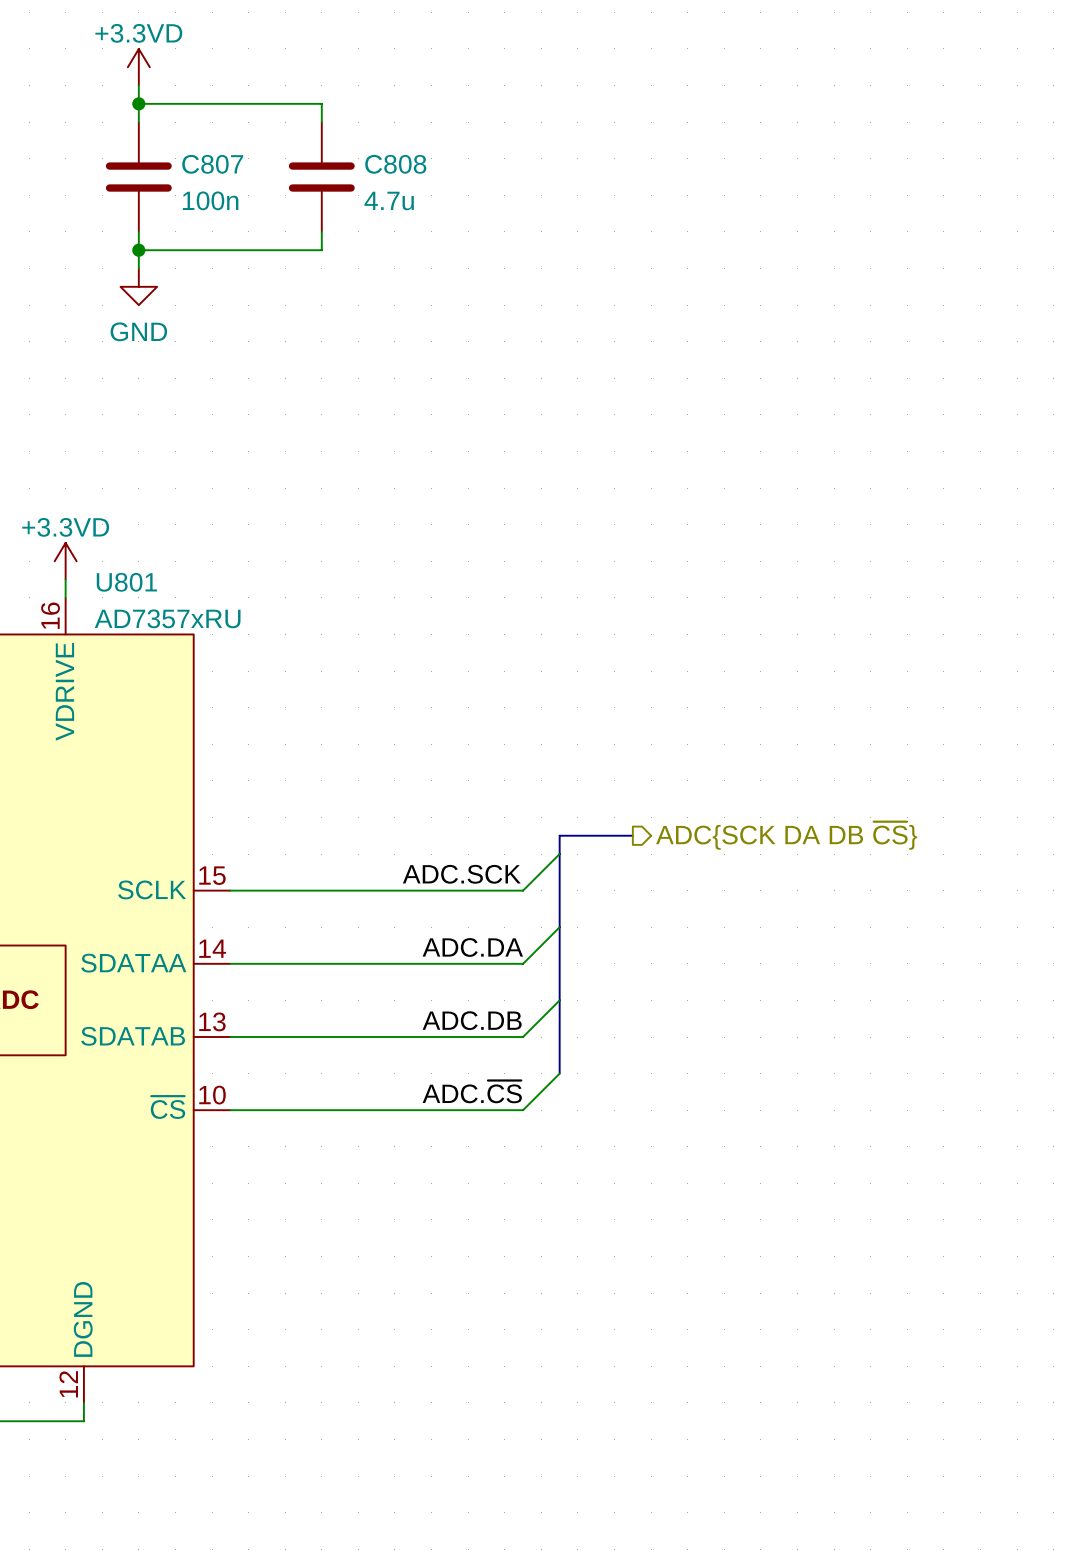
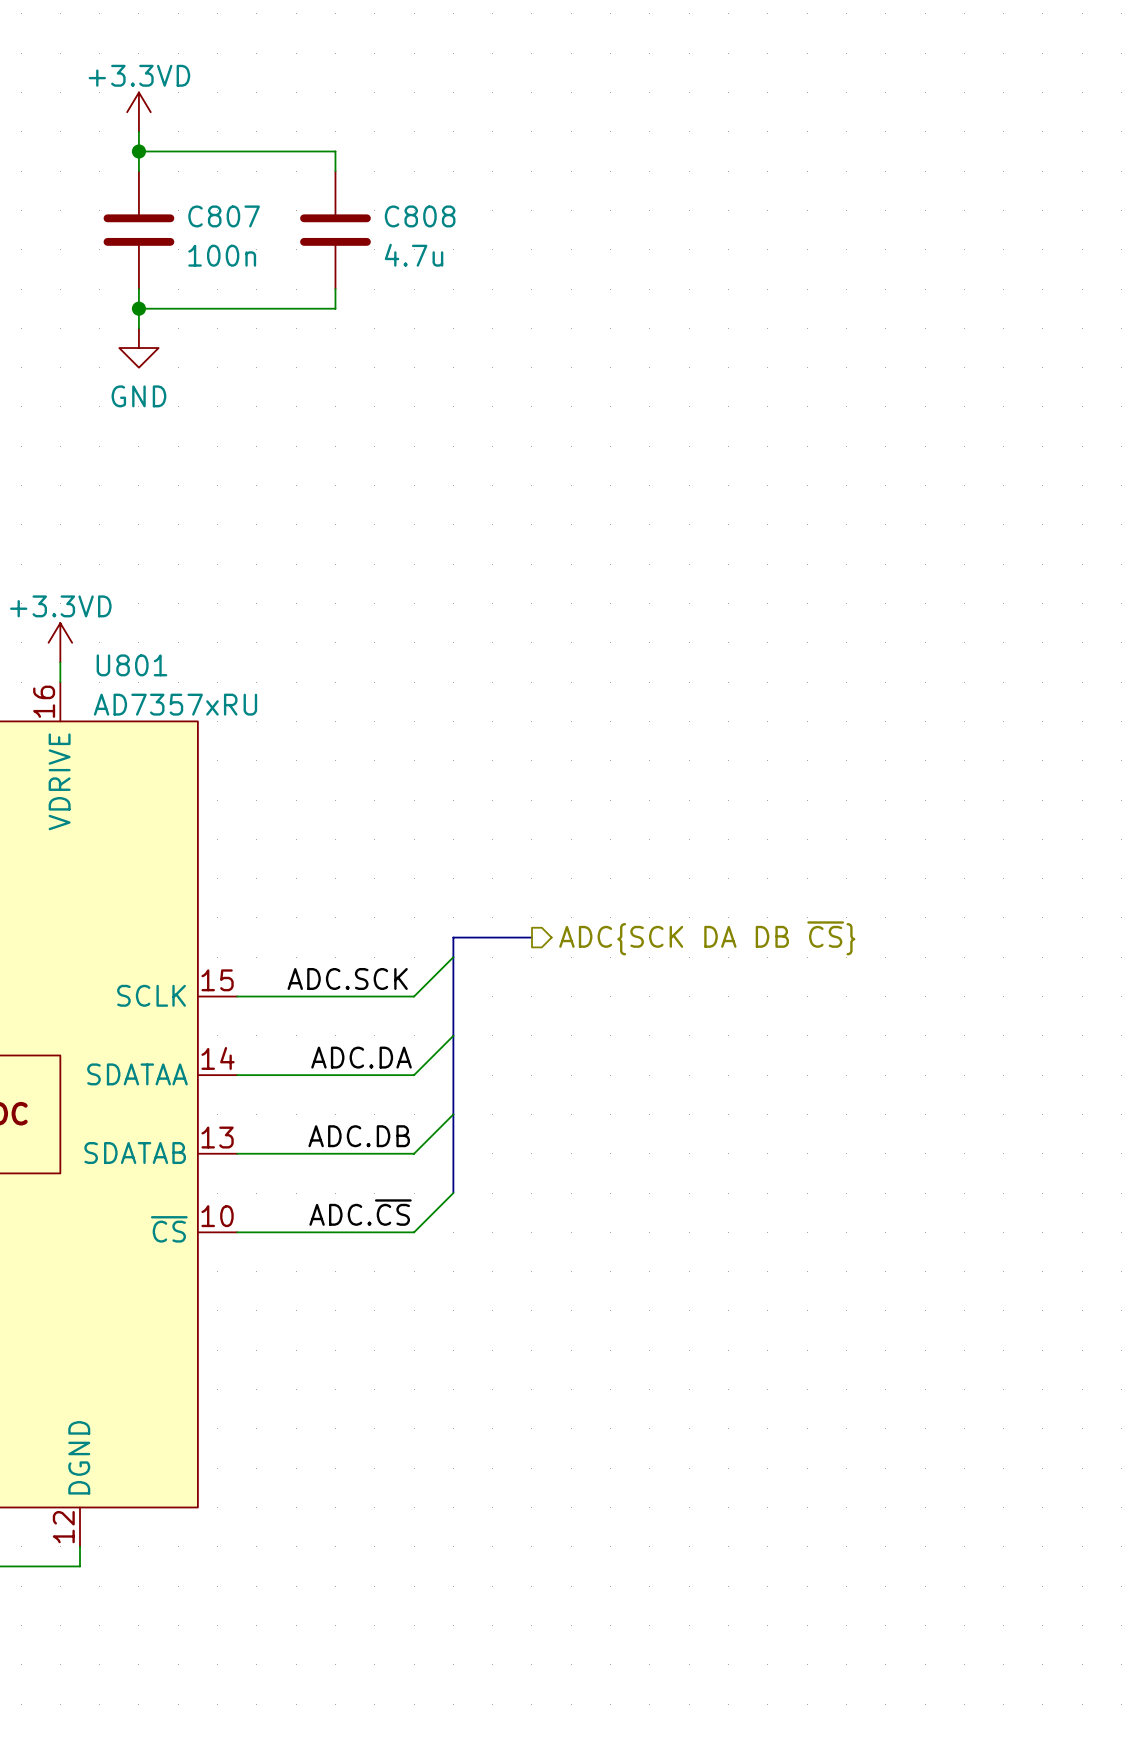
bus: (632, 835) (559, 835) (559, 1073) -> (531, 937) (453, 937) (453, 1193)
hierarchical label position: ADC{SCK DA DB ~{CS}} (786, 835) -> ADC{SCK DA DB ~{CS}} (707, 938)
wire: (559, 854) (523, 890) (394, 890) -> (453, 957) (414, 996)
label position: ADC.SCK (461, 874) -> ADC.SCK (347, 978)
wire: (559, 927) (523, 963) (394, 963) -> (453, 1035) (414, 1075)
label position: ADC.DA (472, 947) -> ADC.DA (361, 1057)
wire: (559, 1000) (523, 1037) (394, 1037) -> (453, 1114) (414, 1153)
label position: ADC.DB (472, 1020) -> ADC.DB (359, 1136)
wire: (559, 1073) (523, 1110) (394, 1110) -> (453, 1193) (414, 1232)
label position: ADC.~{CS} (472, 1091) -> ADC.~{CS} (360, 1212)

